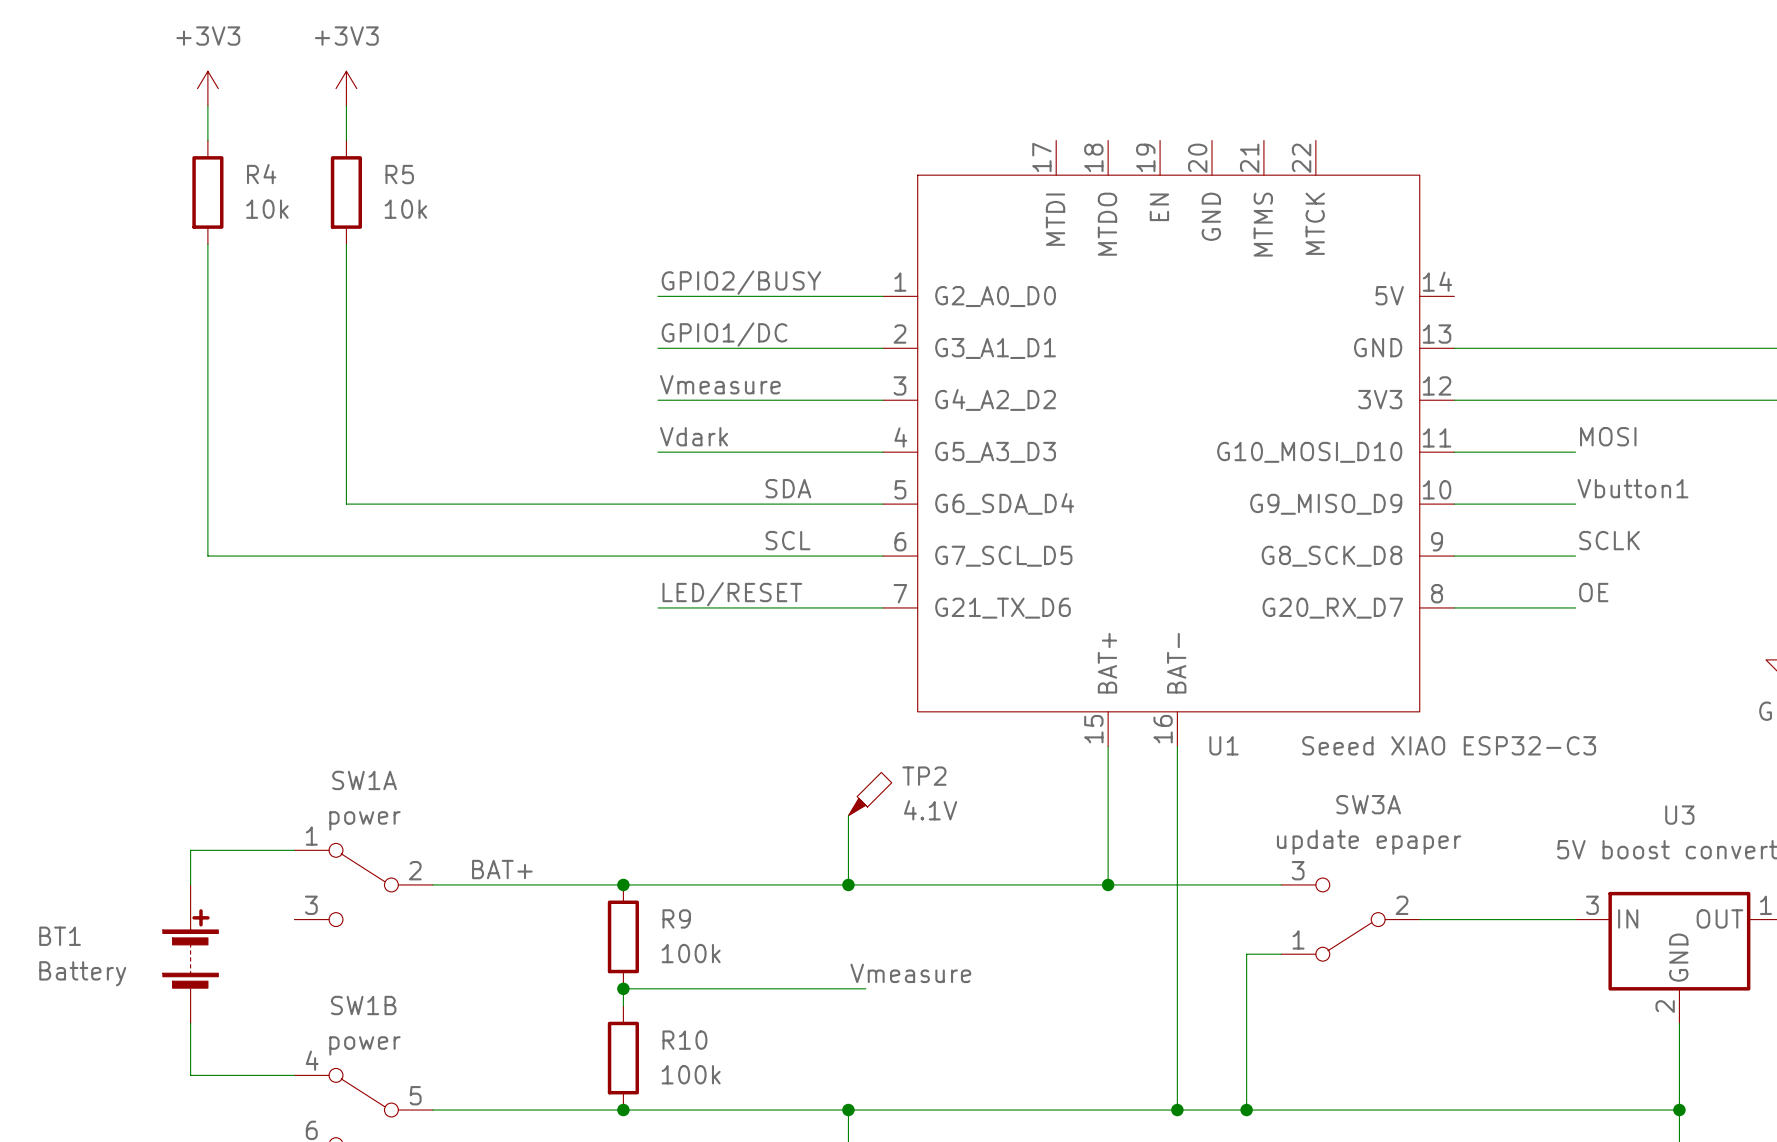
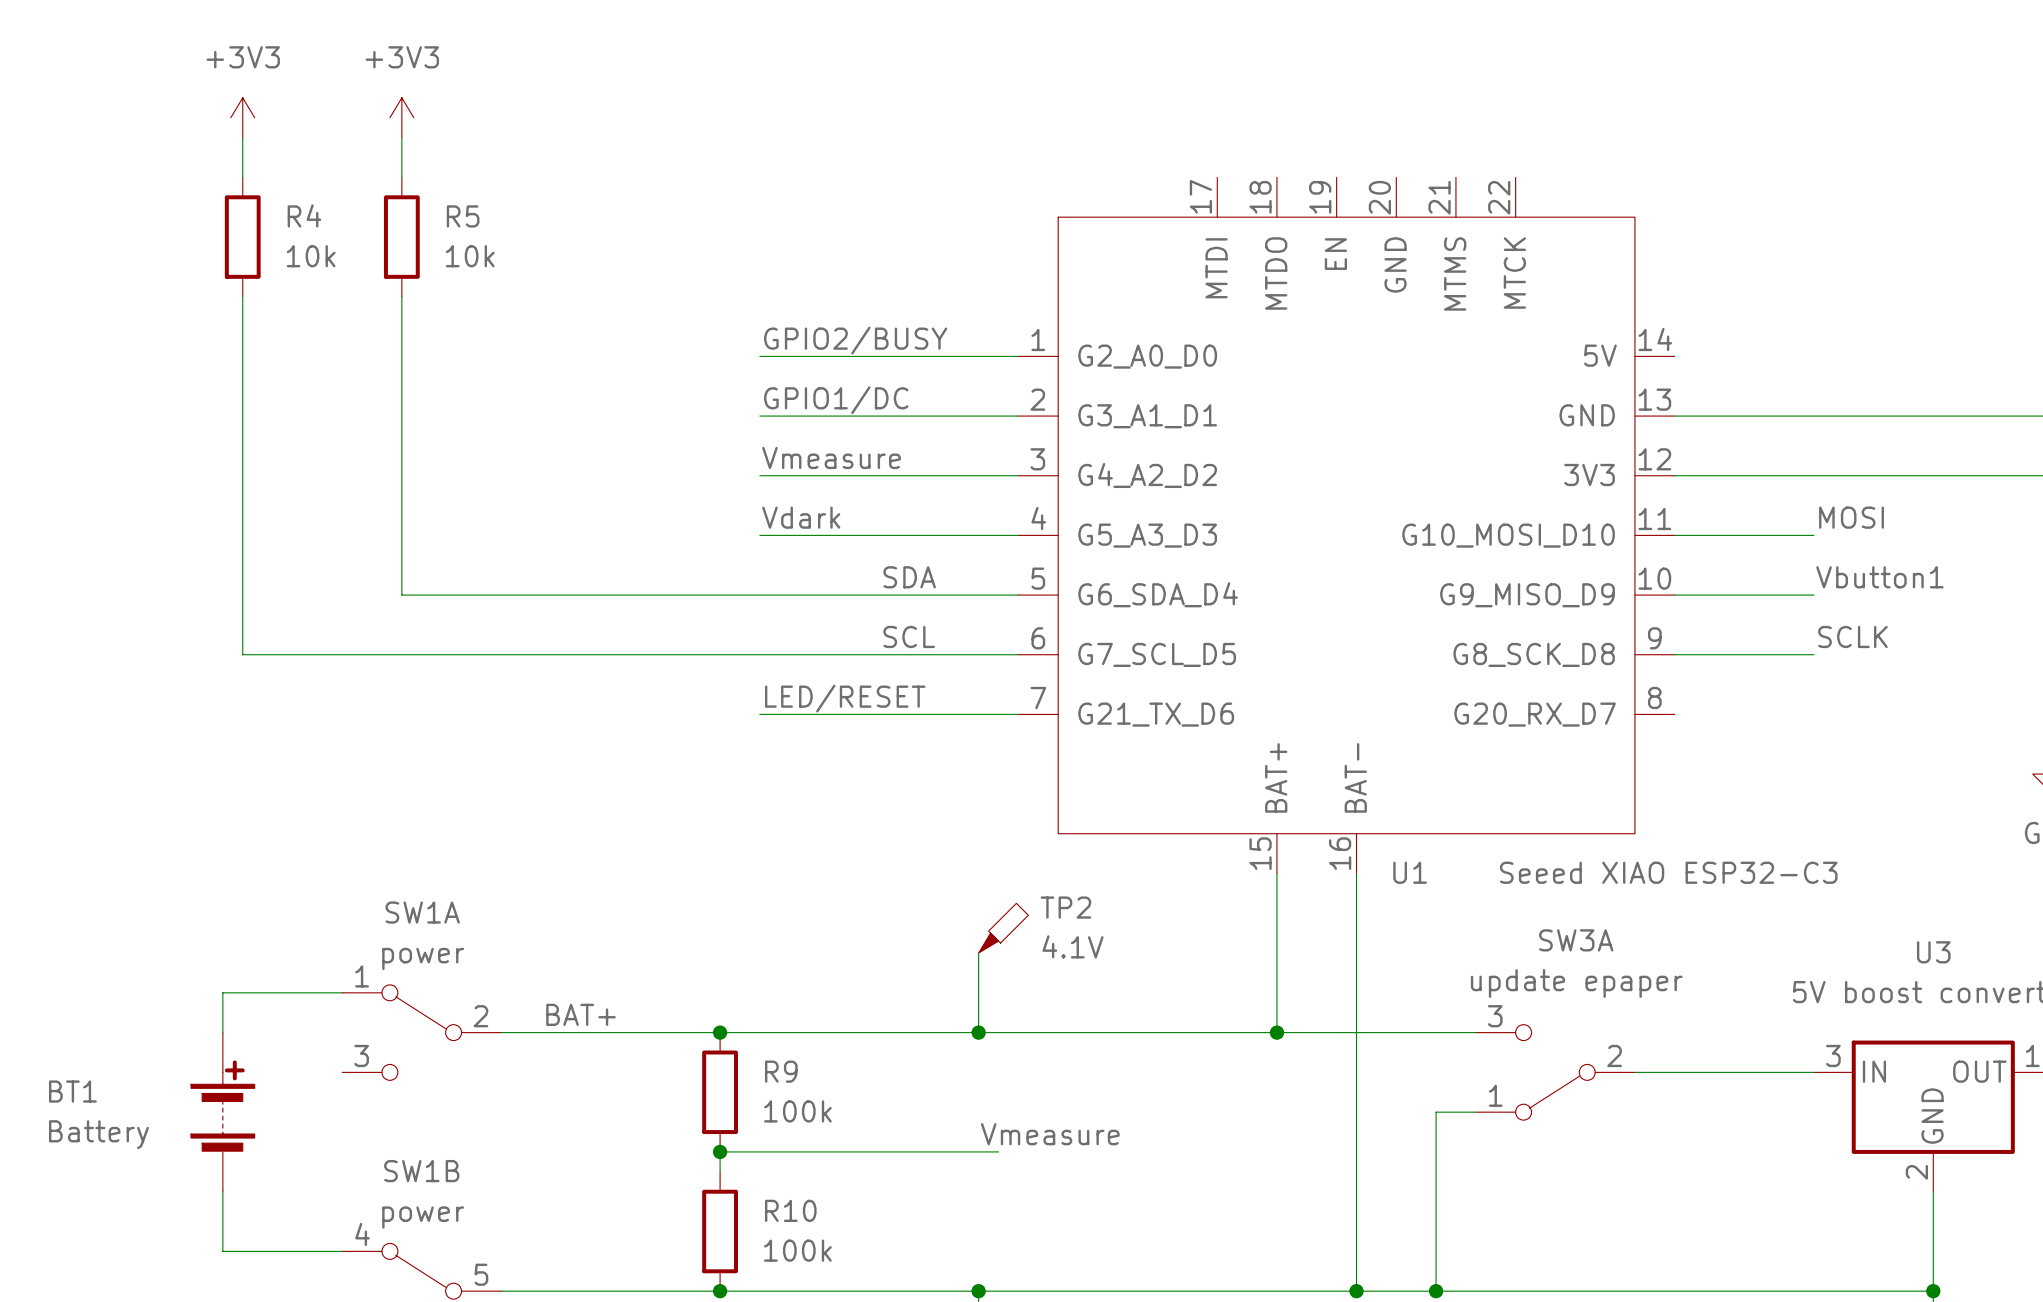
label: OE (1593, 592) -> none
wire: (1454, 607) (1575, 607) -> none

